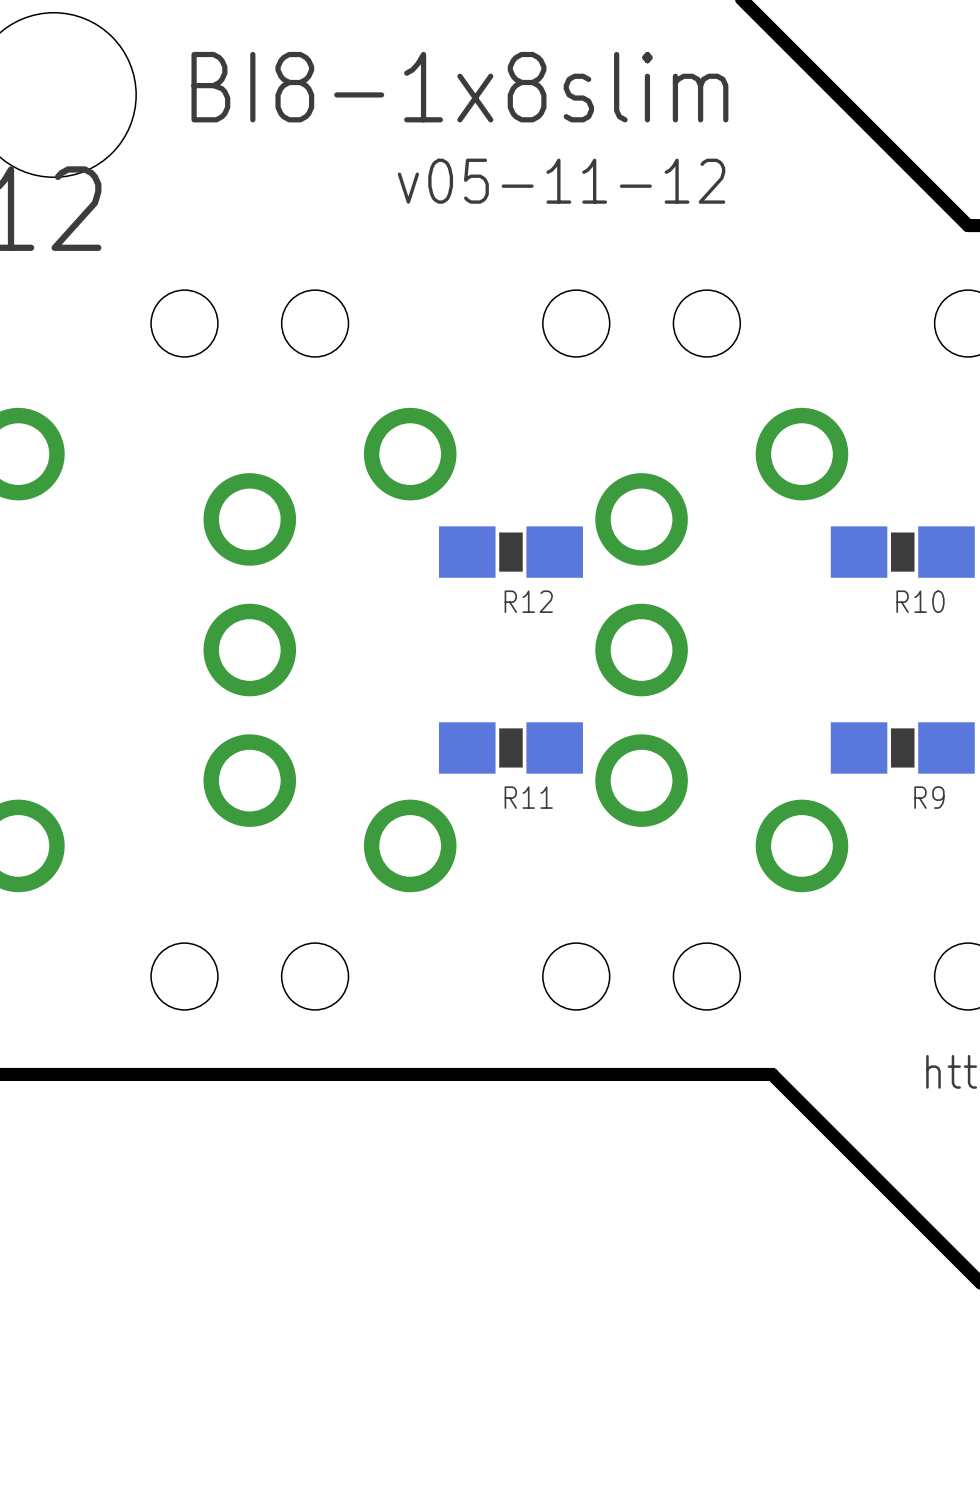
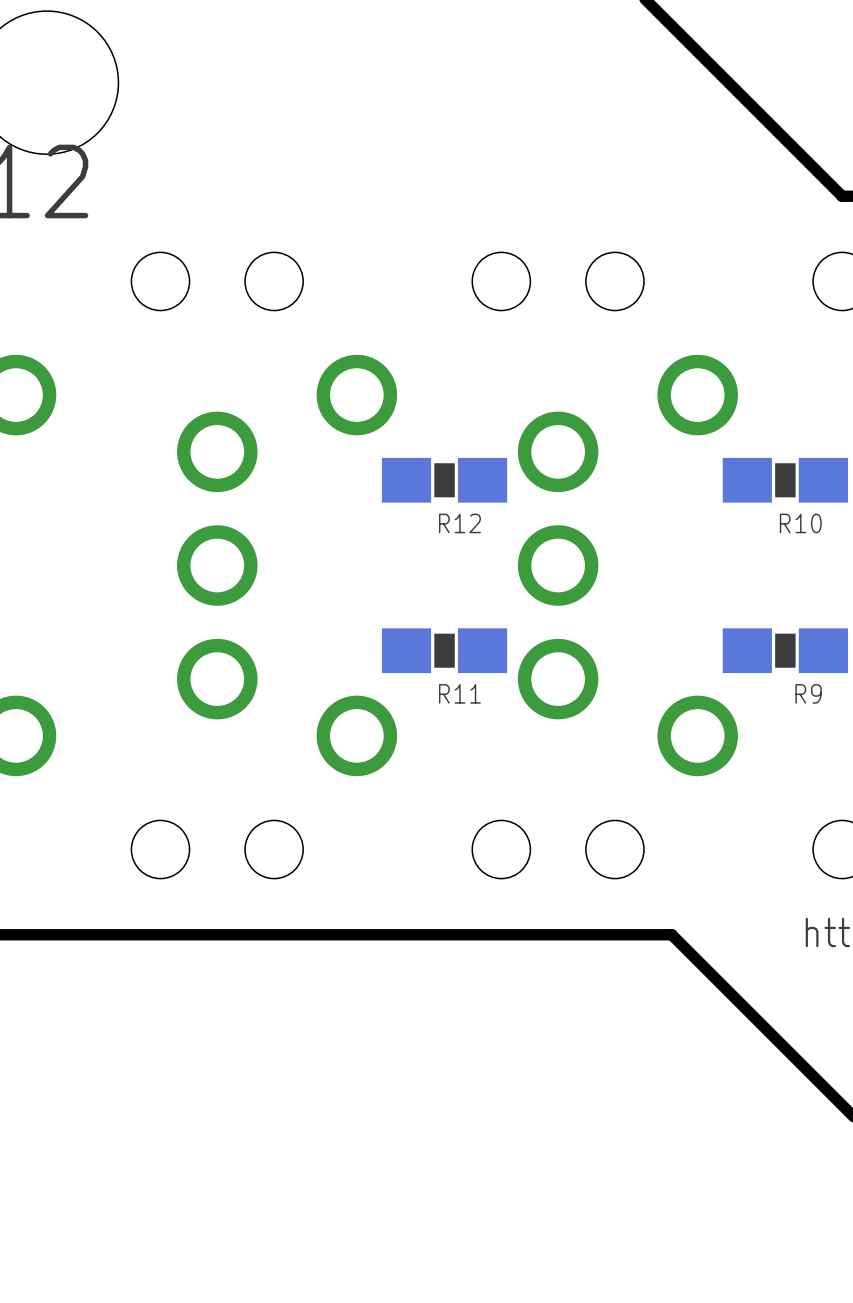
text: BI8-1x8slim (459, 87) -> none
text: v05-11-12 (561, 181) -> none

